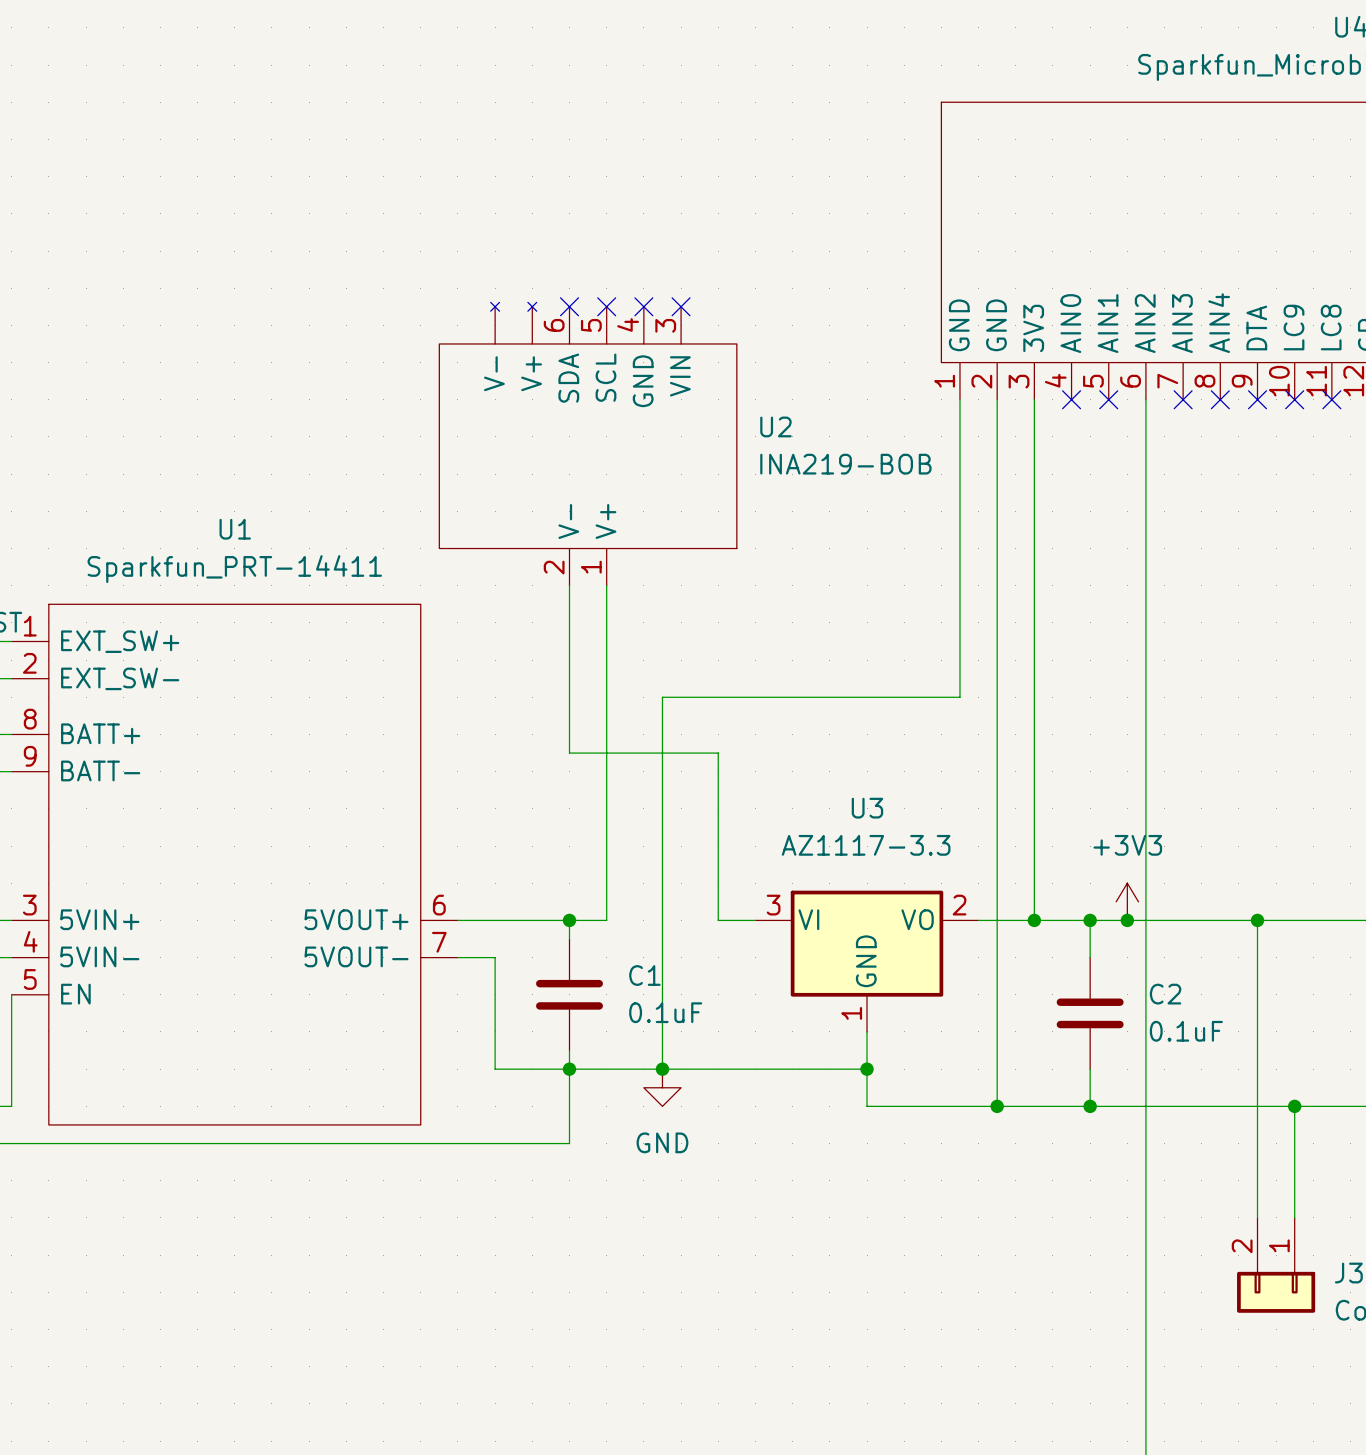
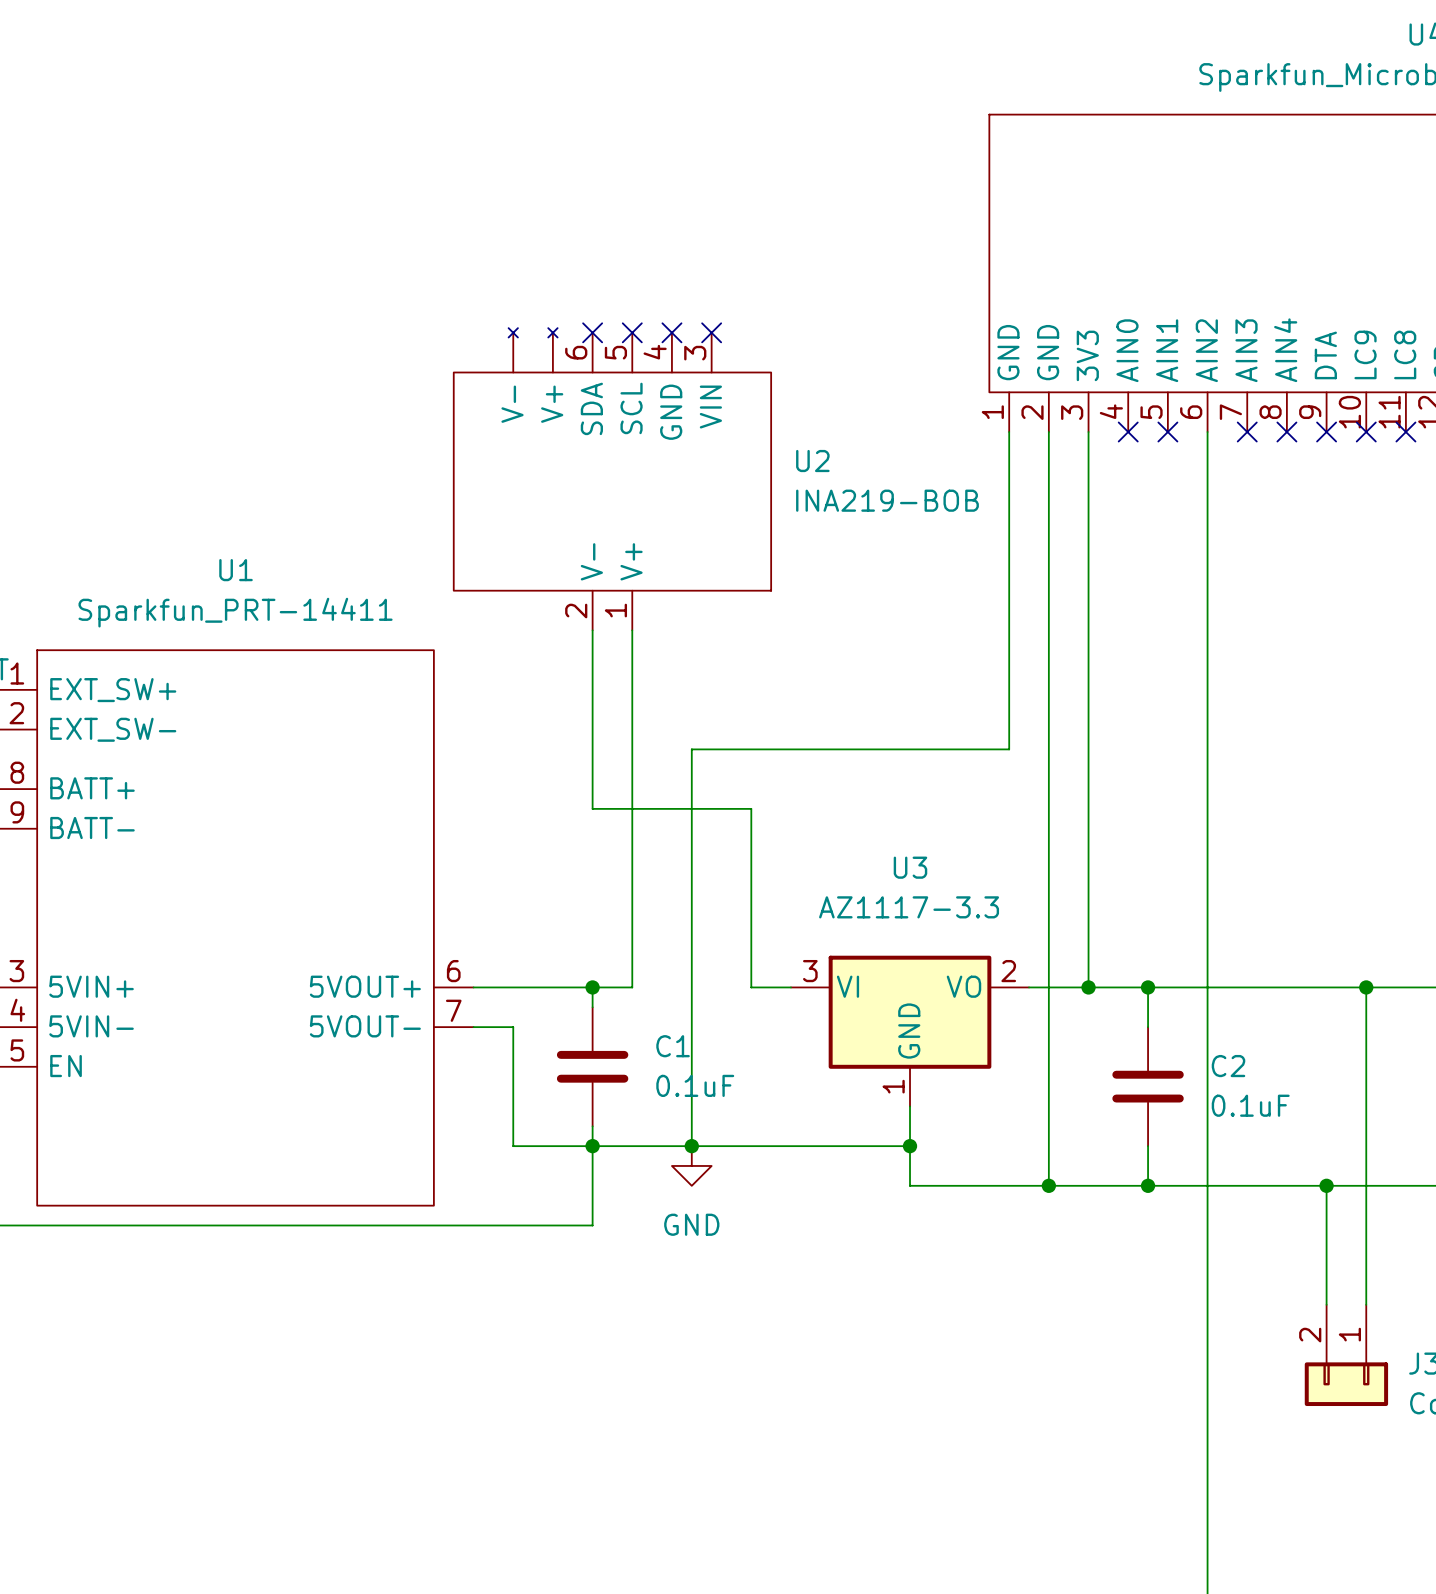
power symbol: +3V3 (1127, 901) -> none
junction: (1127, 920) -> none
wire: (1257, 920) (1257, 1106) -> (1366, 987) (1366, 1185)
junction position: (1257, 920) -> (1366, 987)
junction position: (1294, 1106) -> (1326, 1185)

